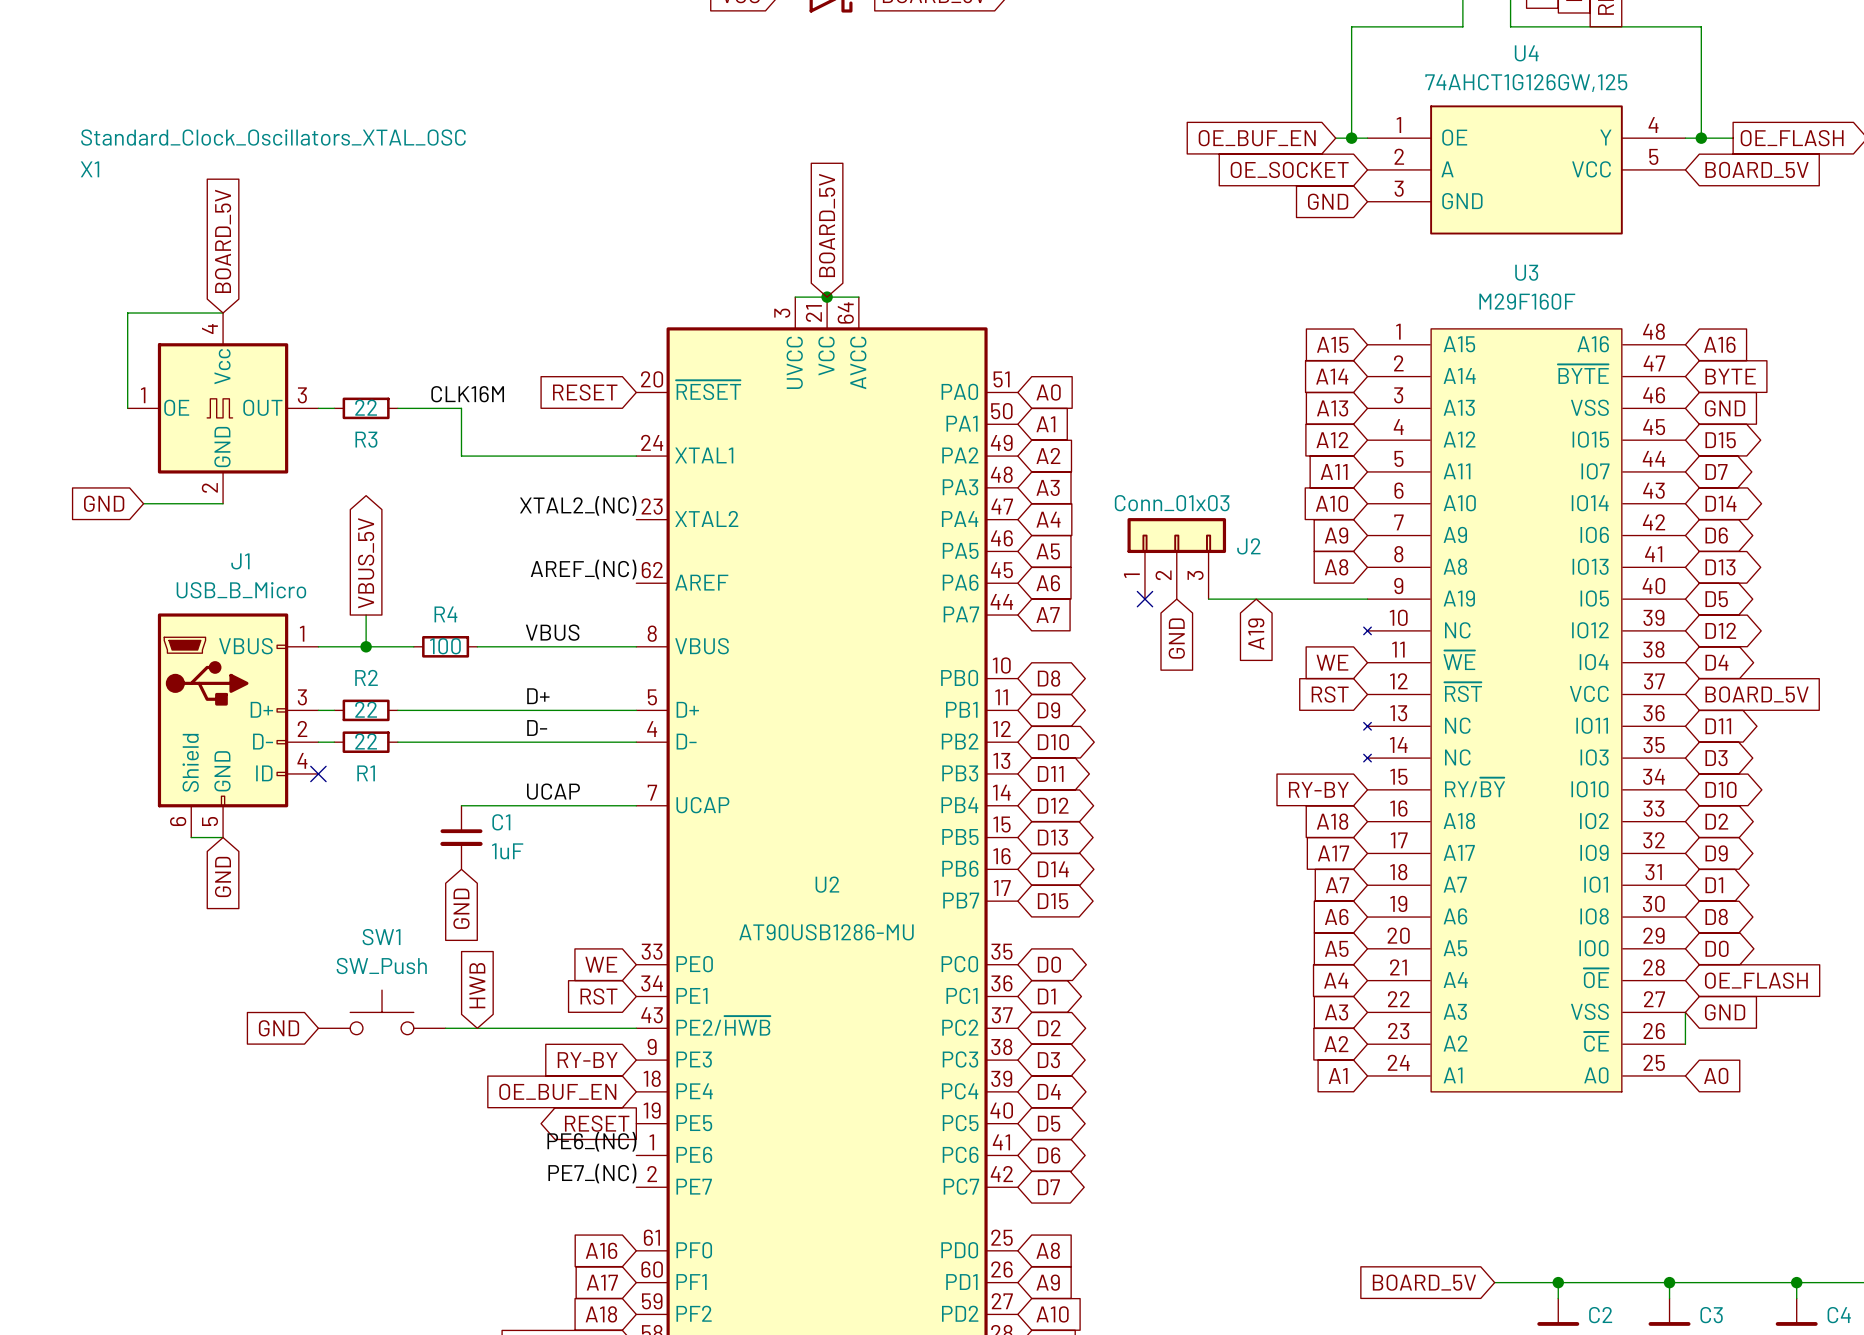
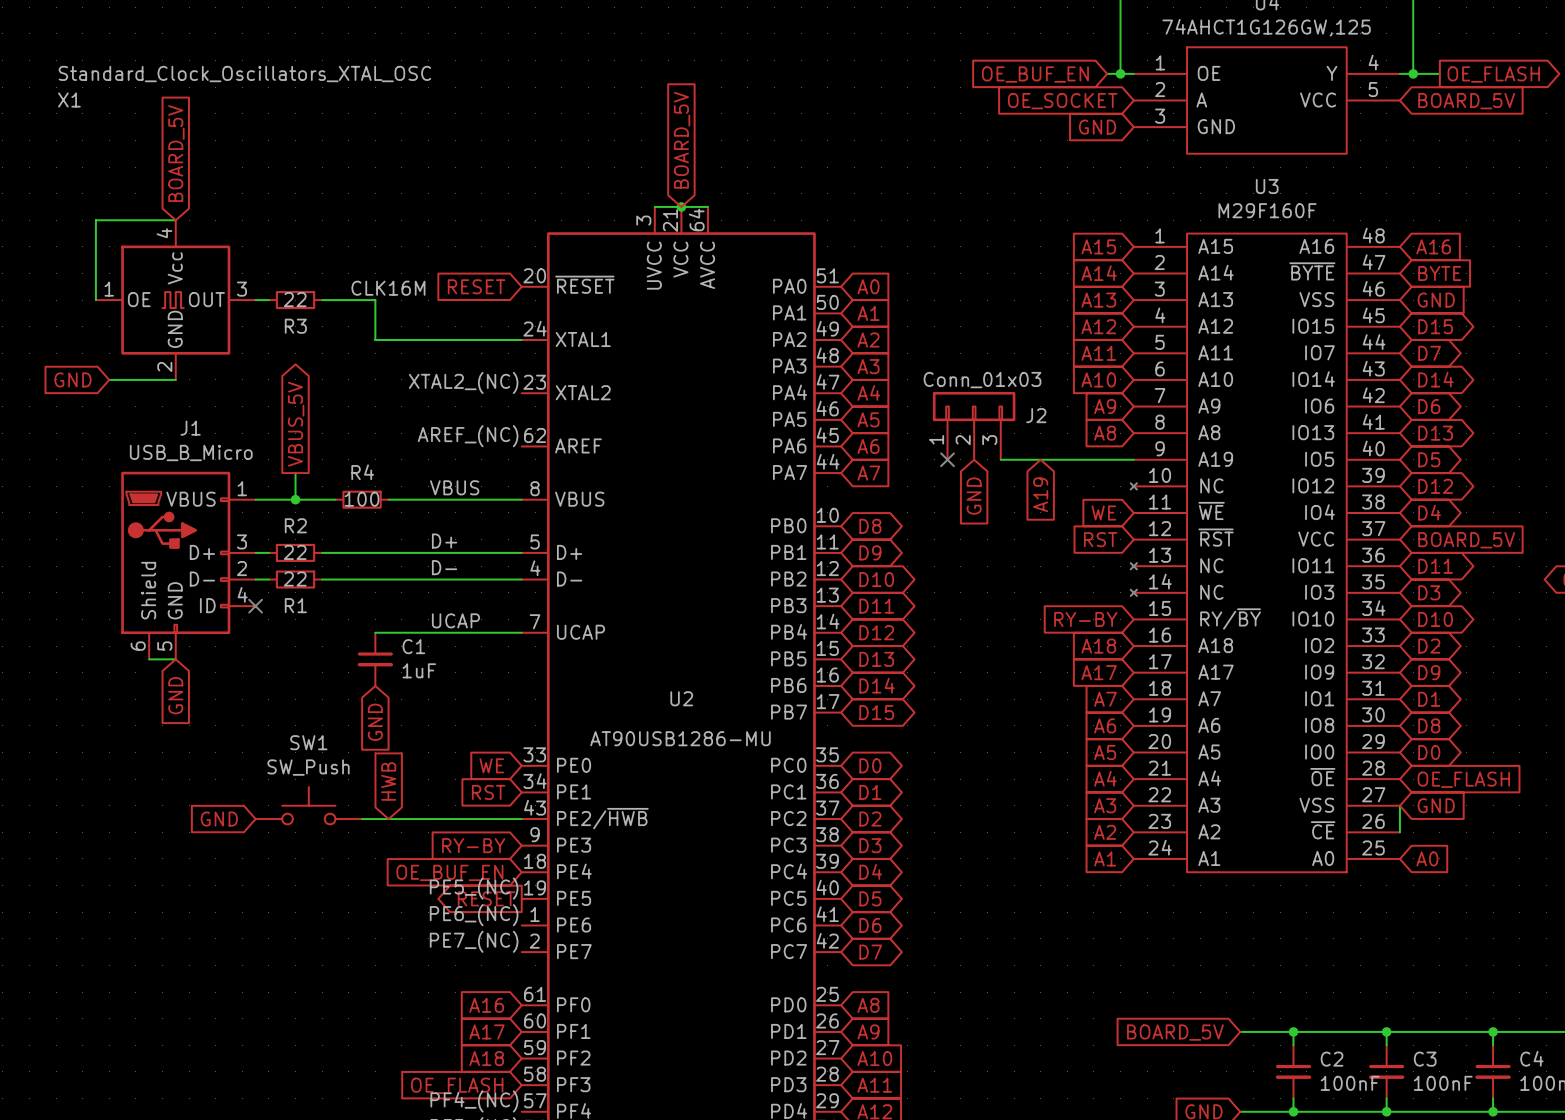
label: none -> PE5_(NC) (474, 888)

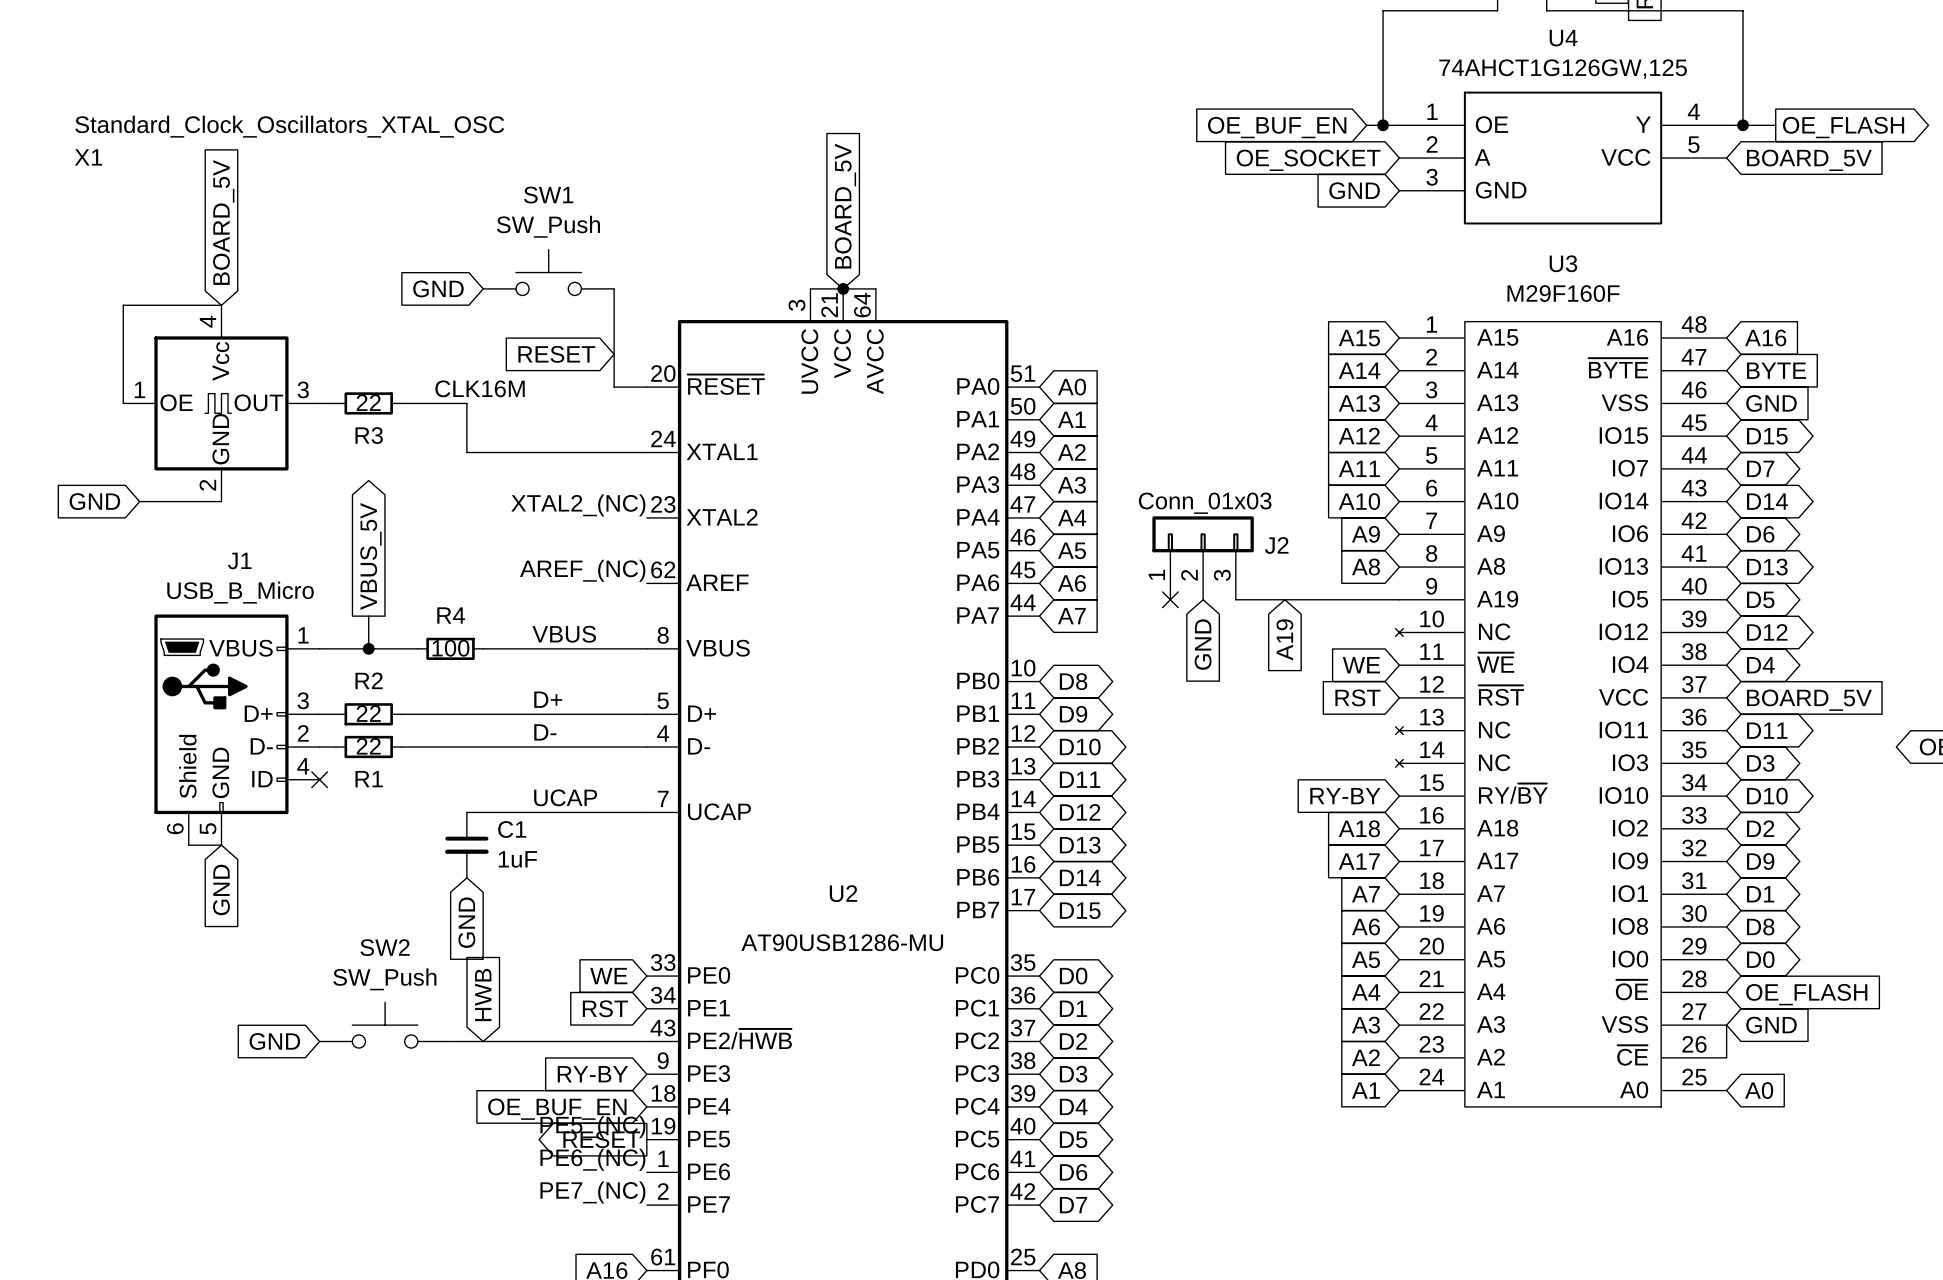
SW1: none -> SW_Push (548, 272)
global label: none -> GND (438, 288)
wire: none -> (614, 288) (614, 387) (646, 387)
global label position: RESET (476, 286) -> RESET (556, 354)
SW1 name: SW1 (308, 742) -> SW2 (385, 947)

